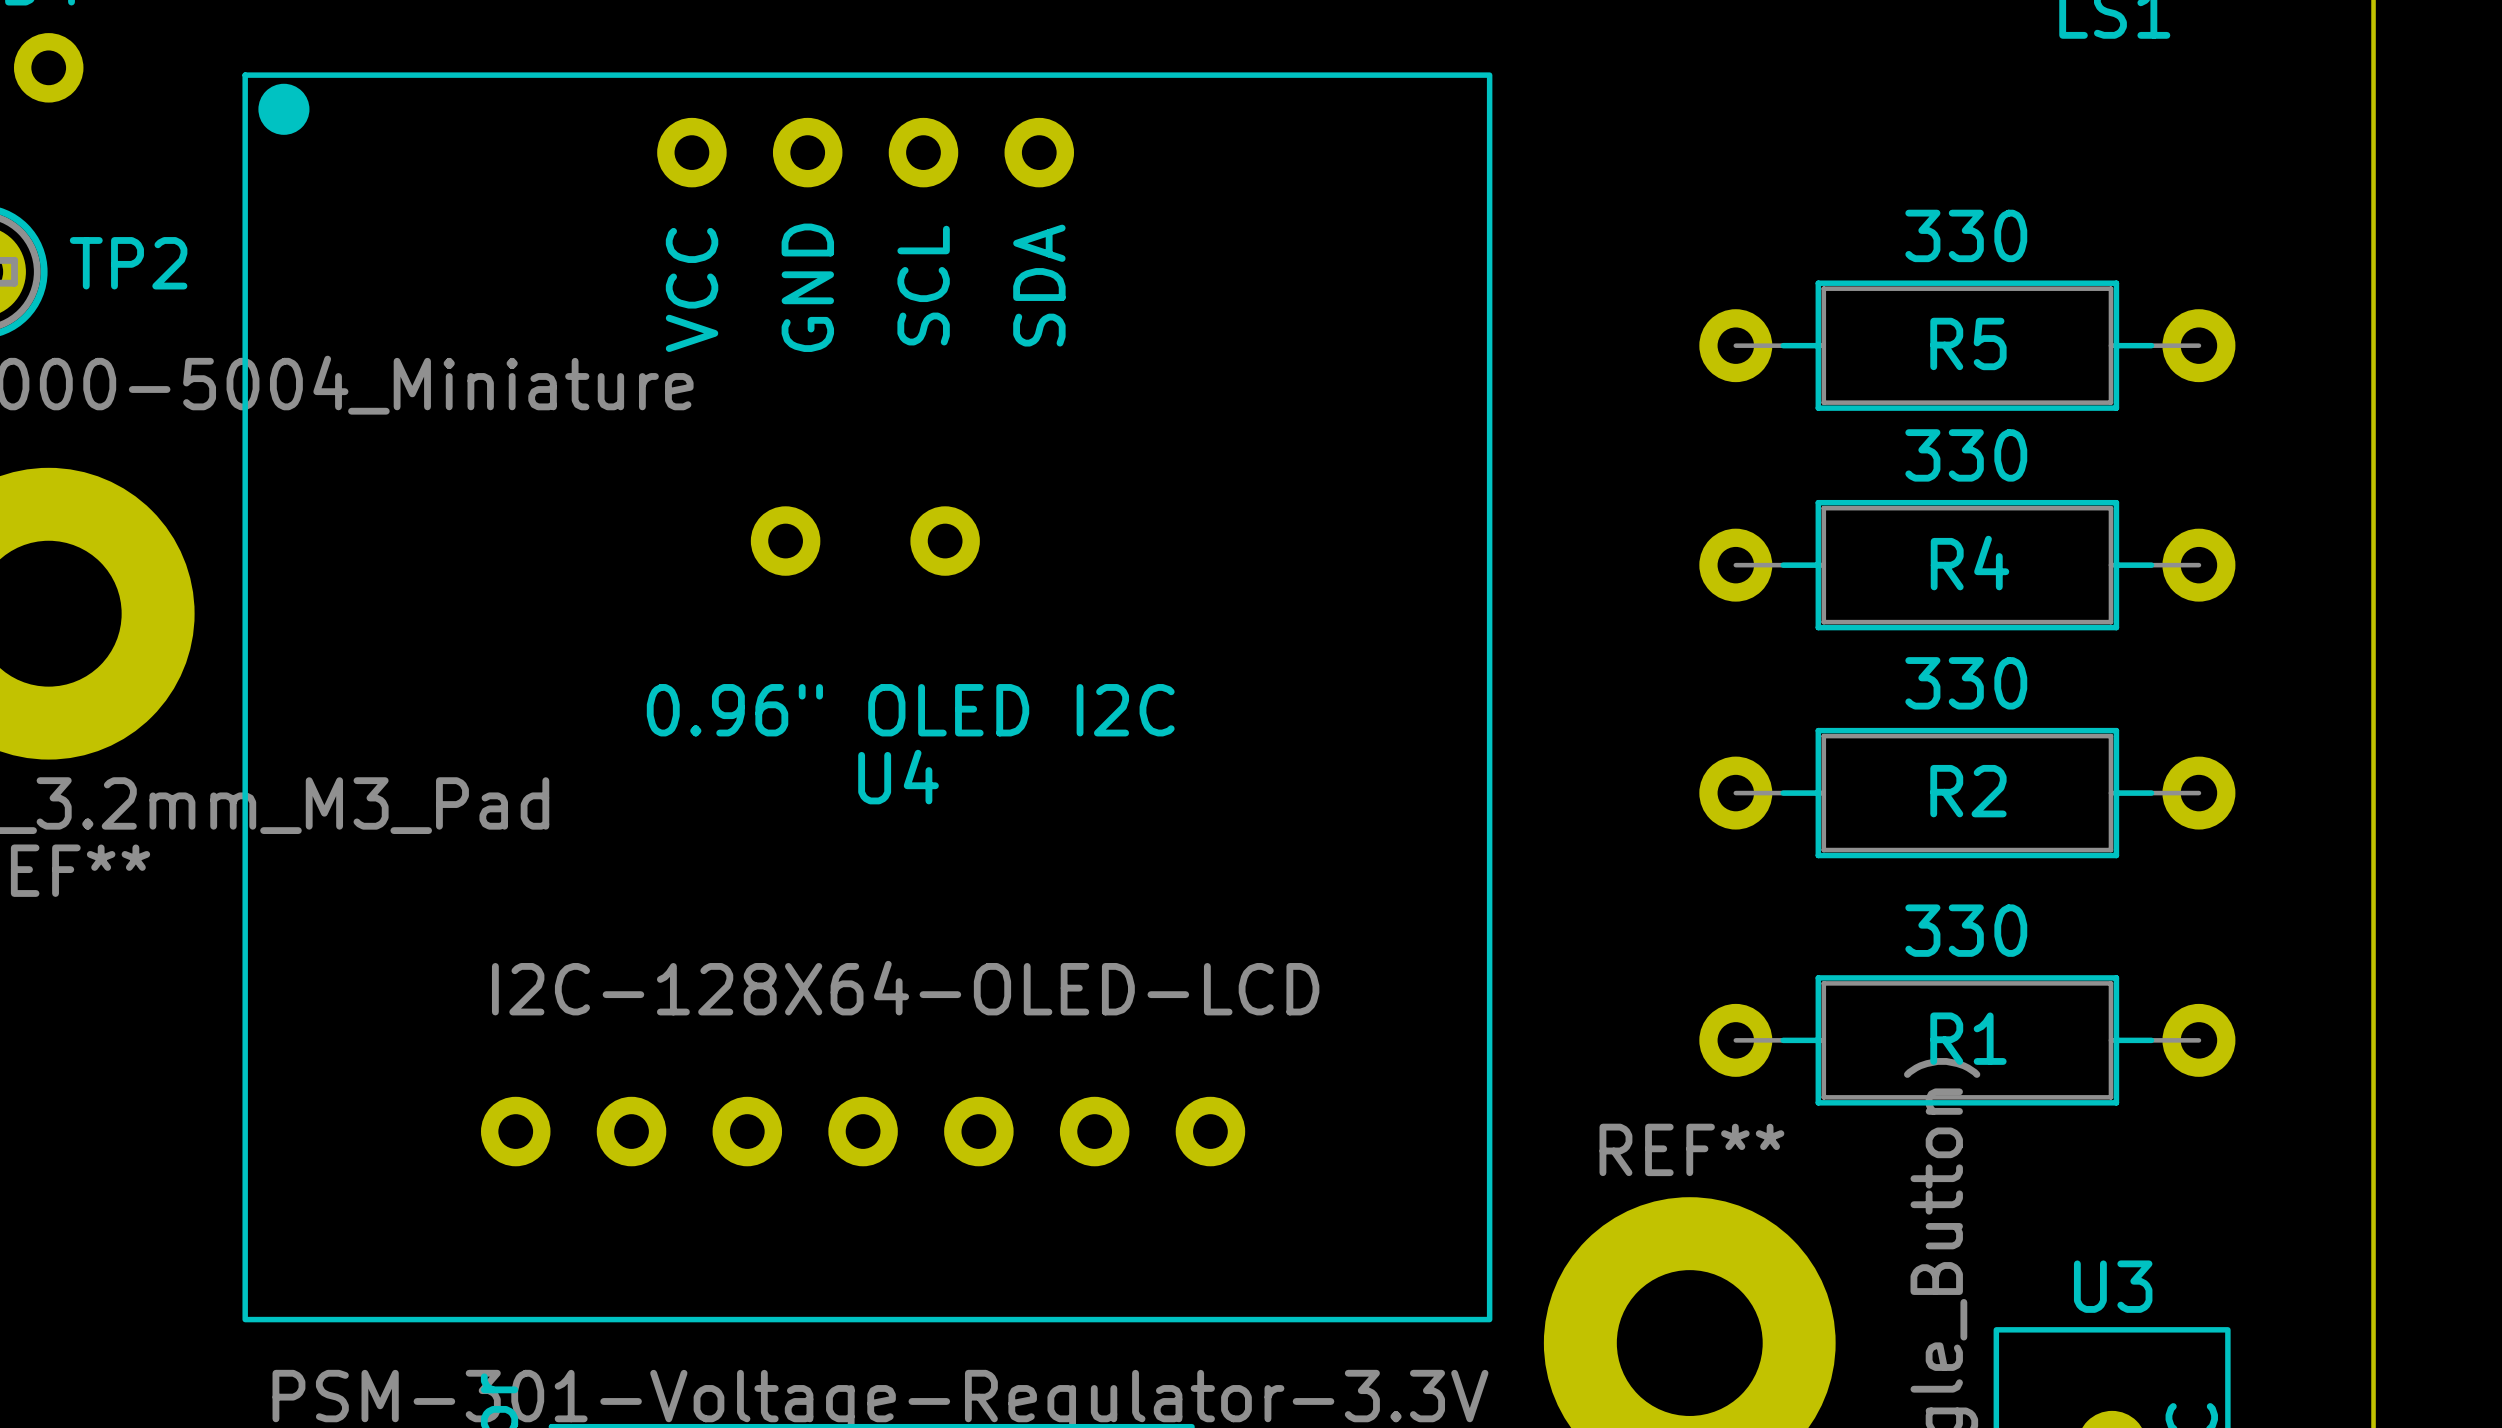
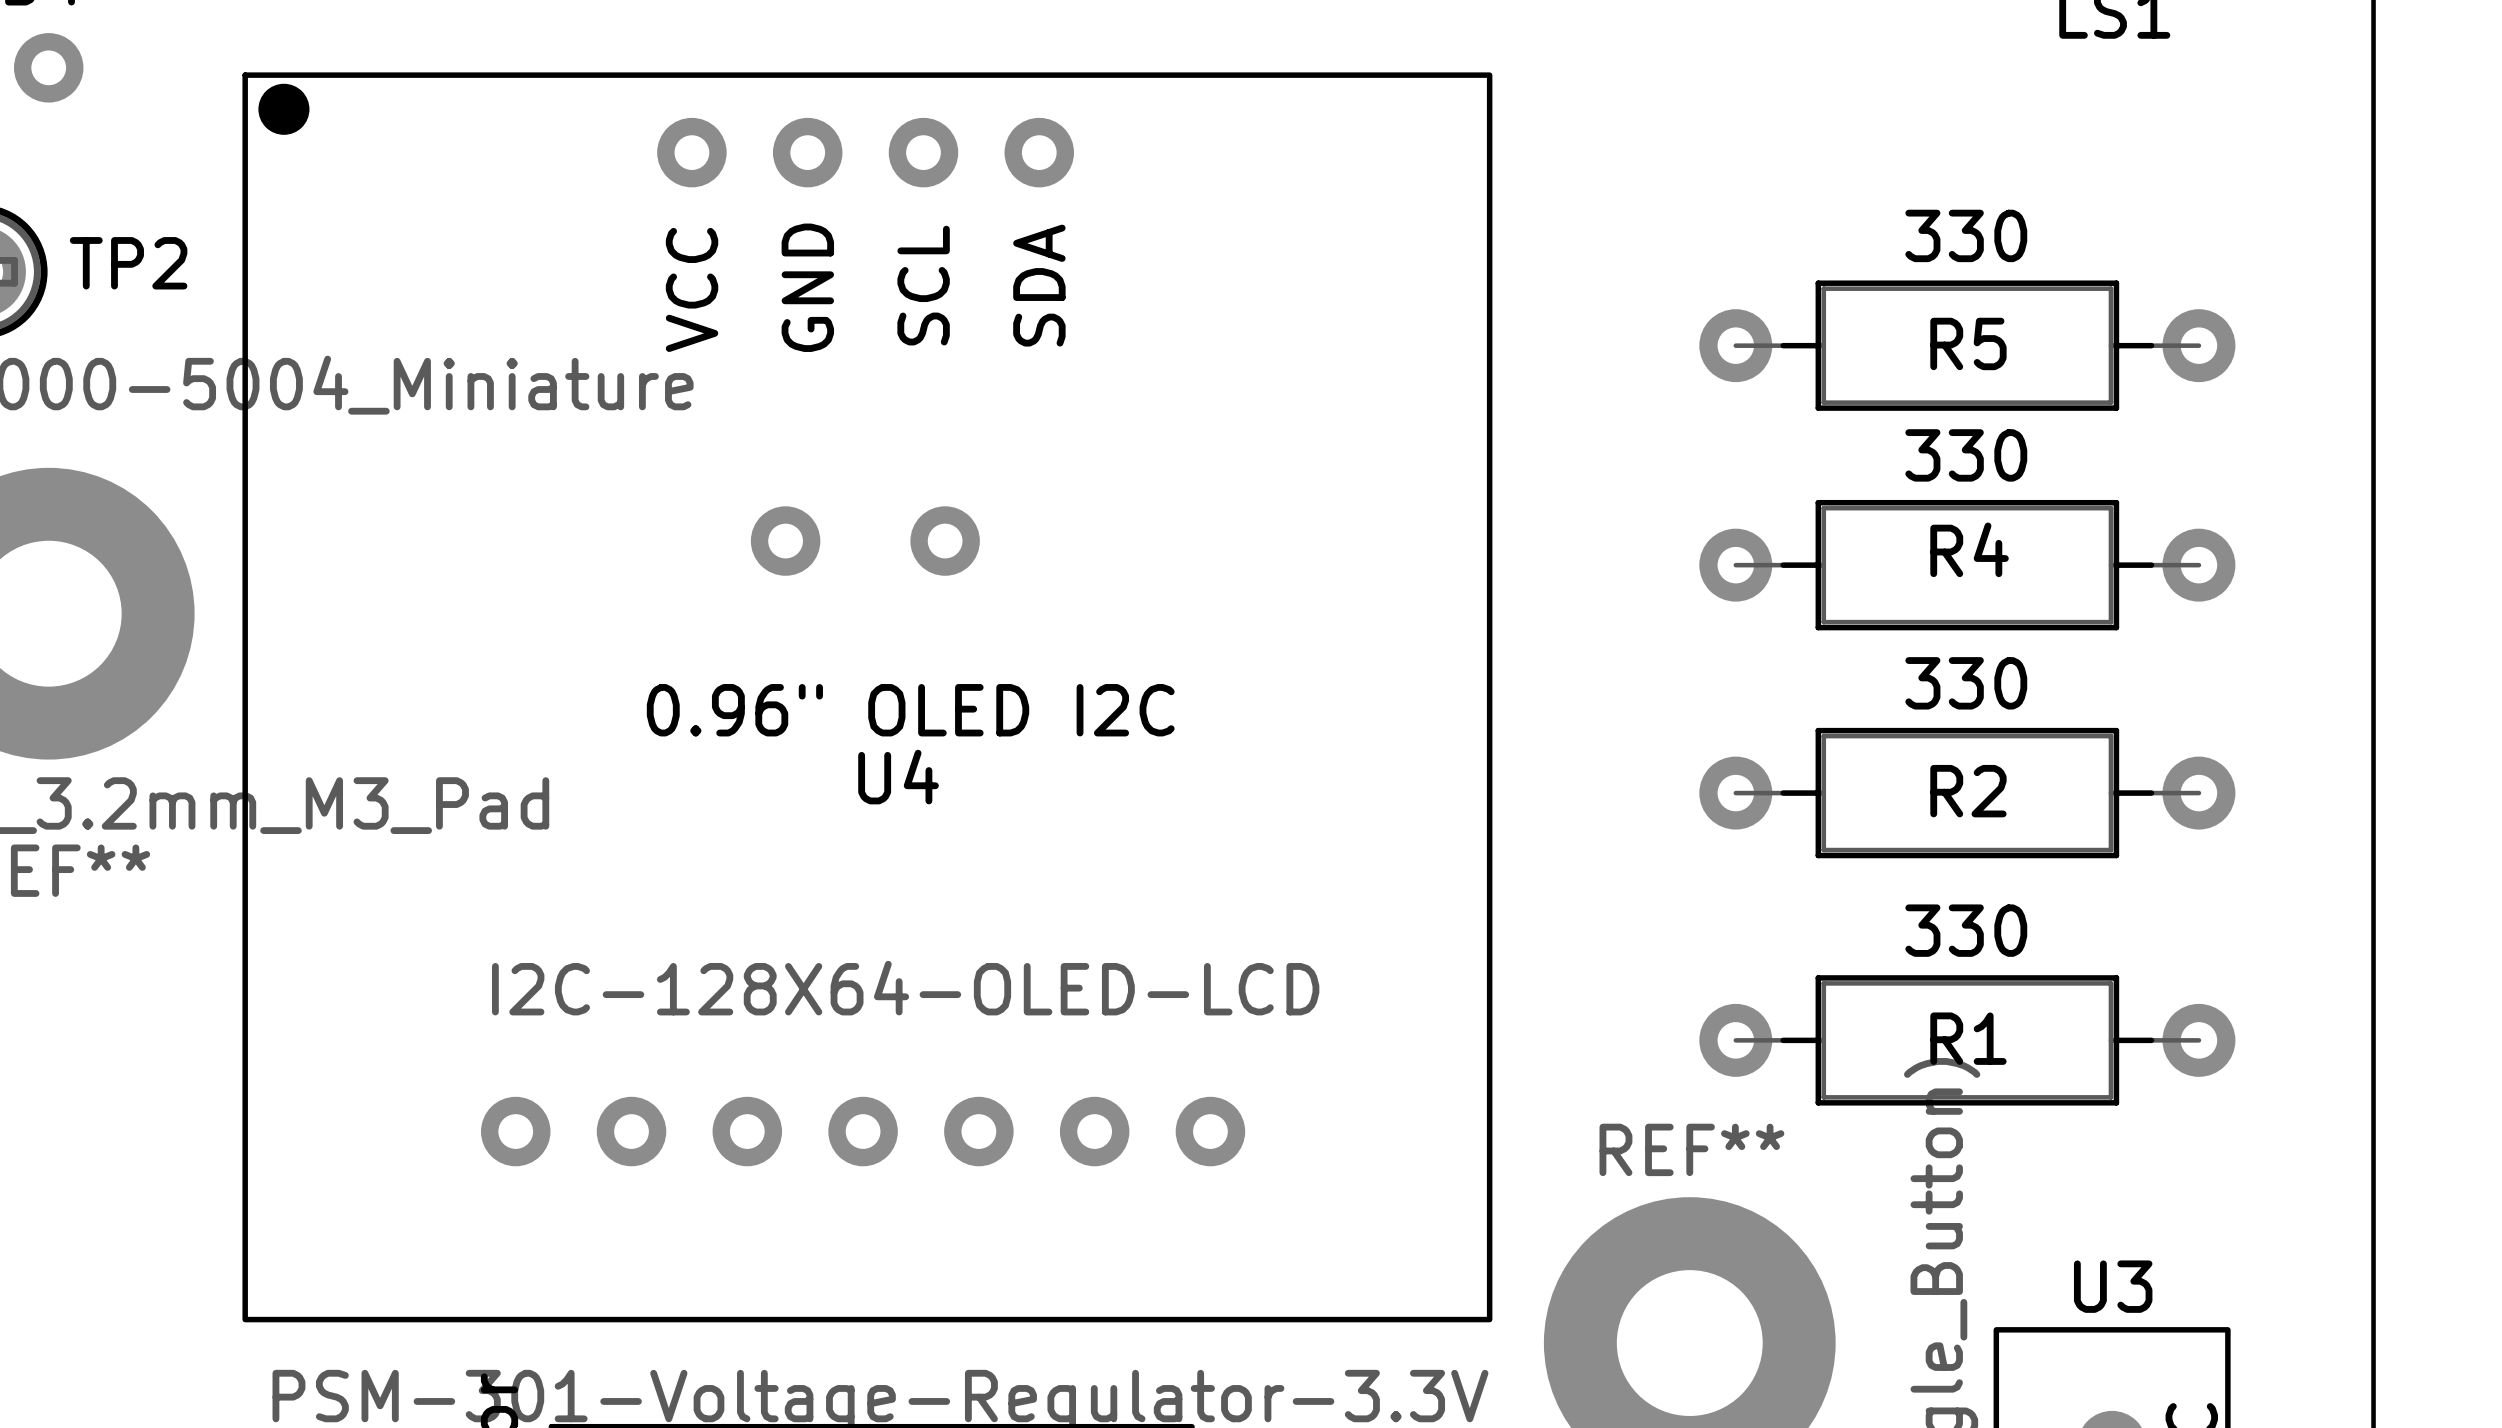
R4 name position: R4 (1970, 563) -> R4 (1969, 549)

